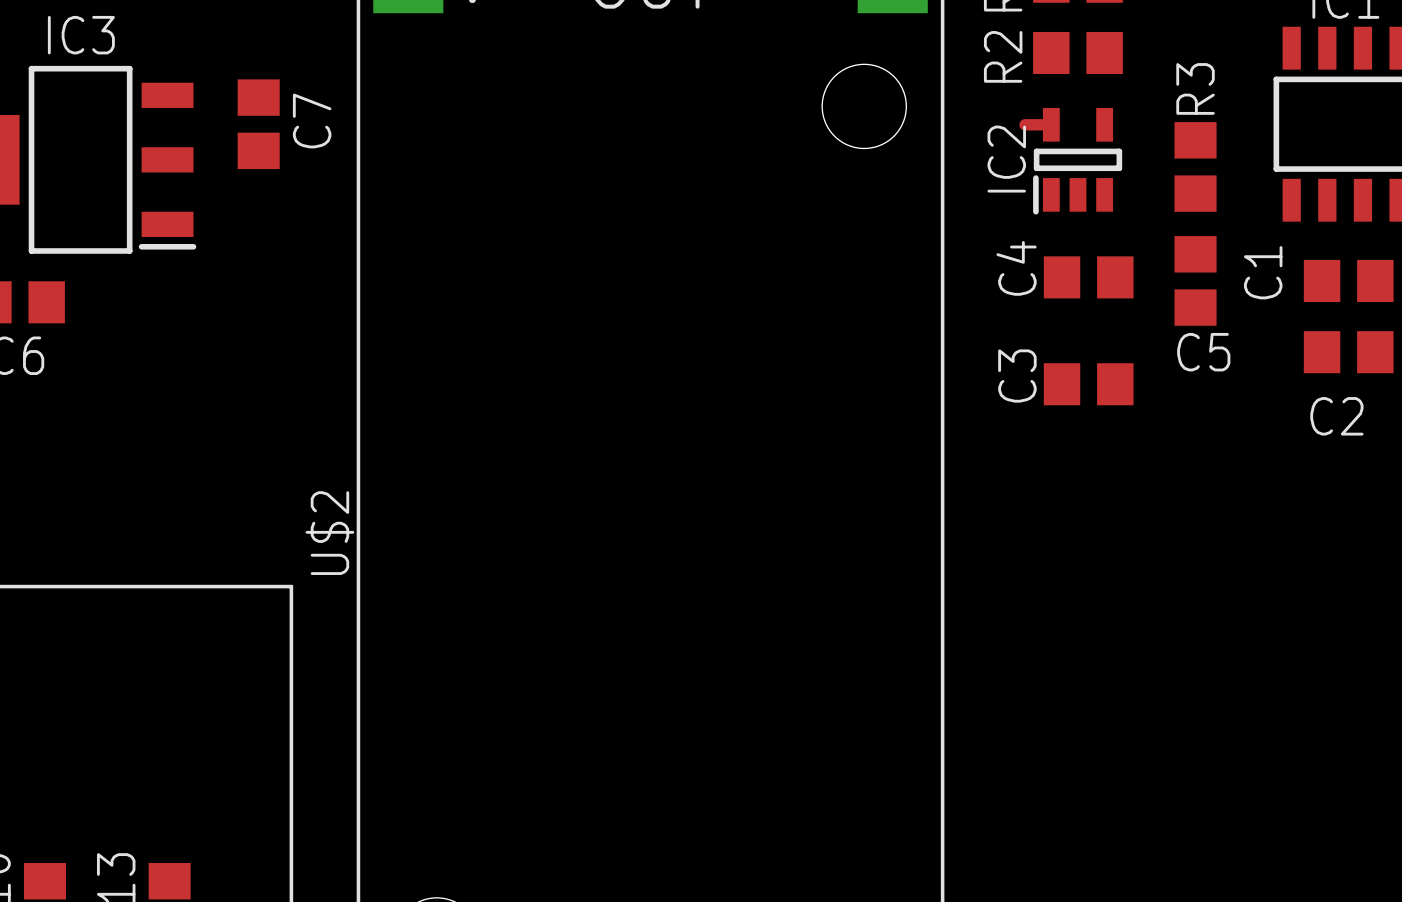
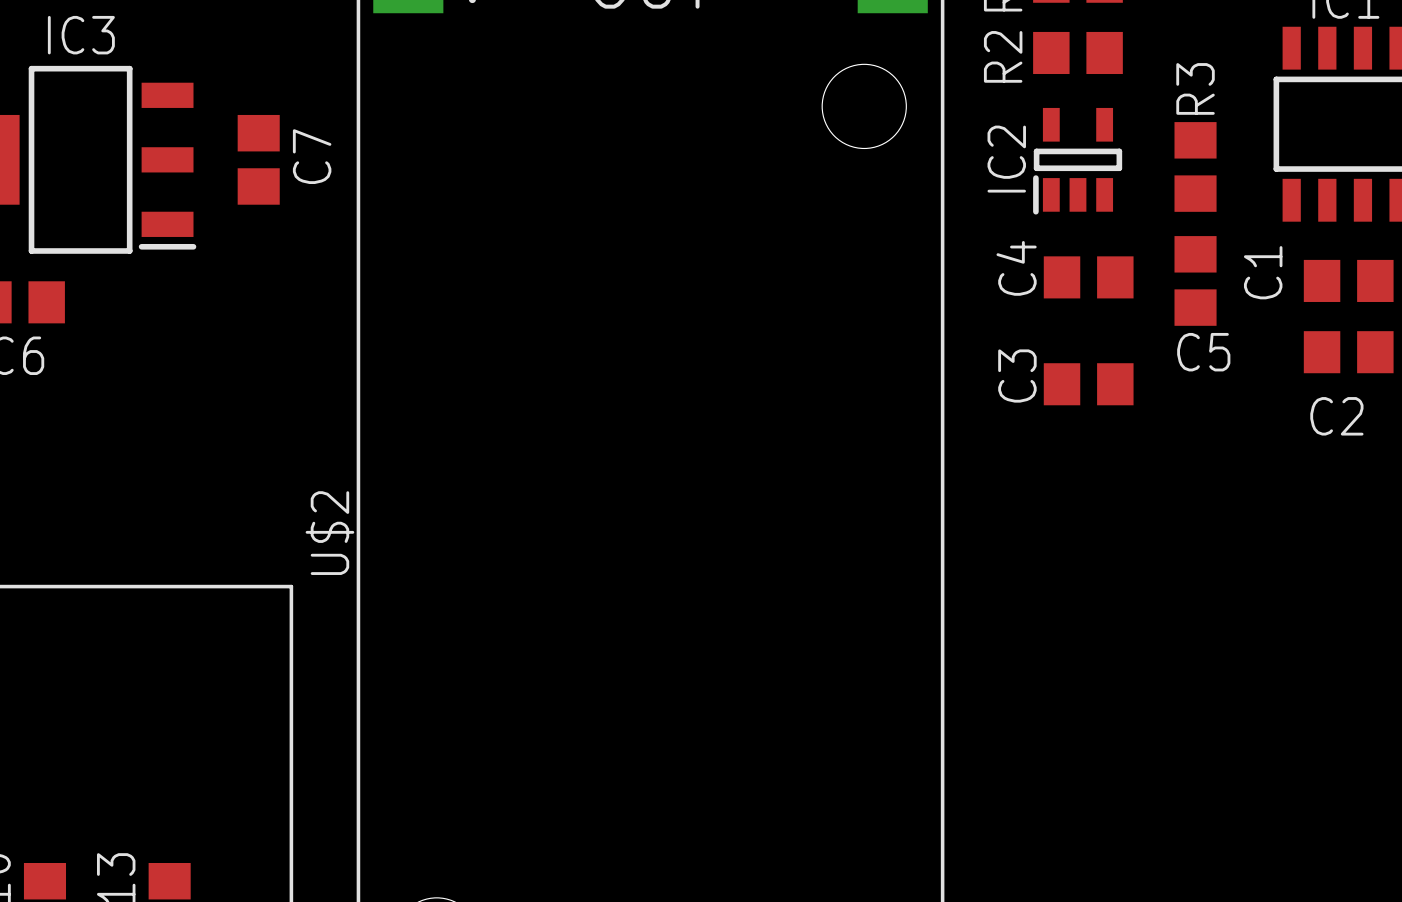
C7 position: (258, 124) -> (258, 159)
top track: (1024, 124) (1051, 124) -> none

